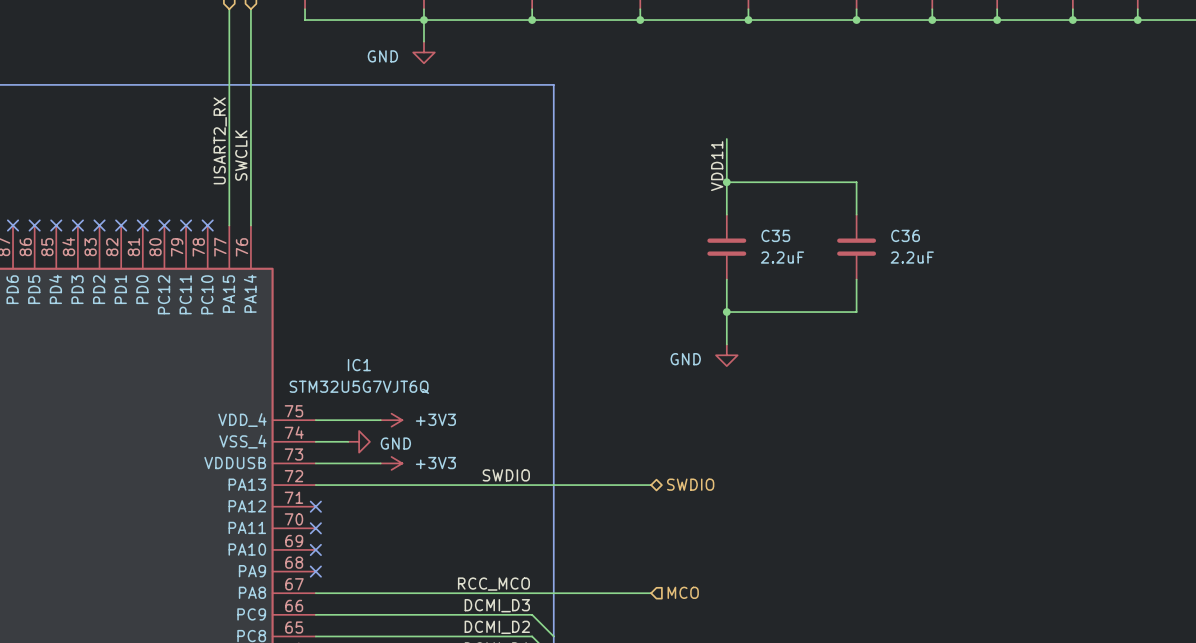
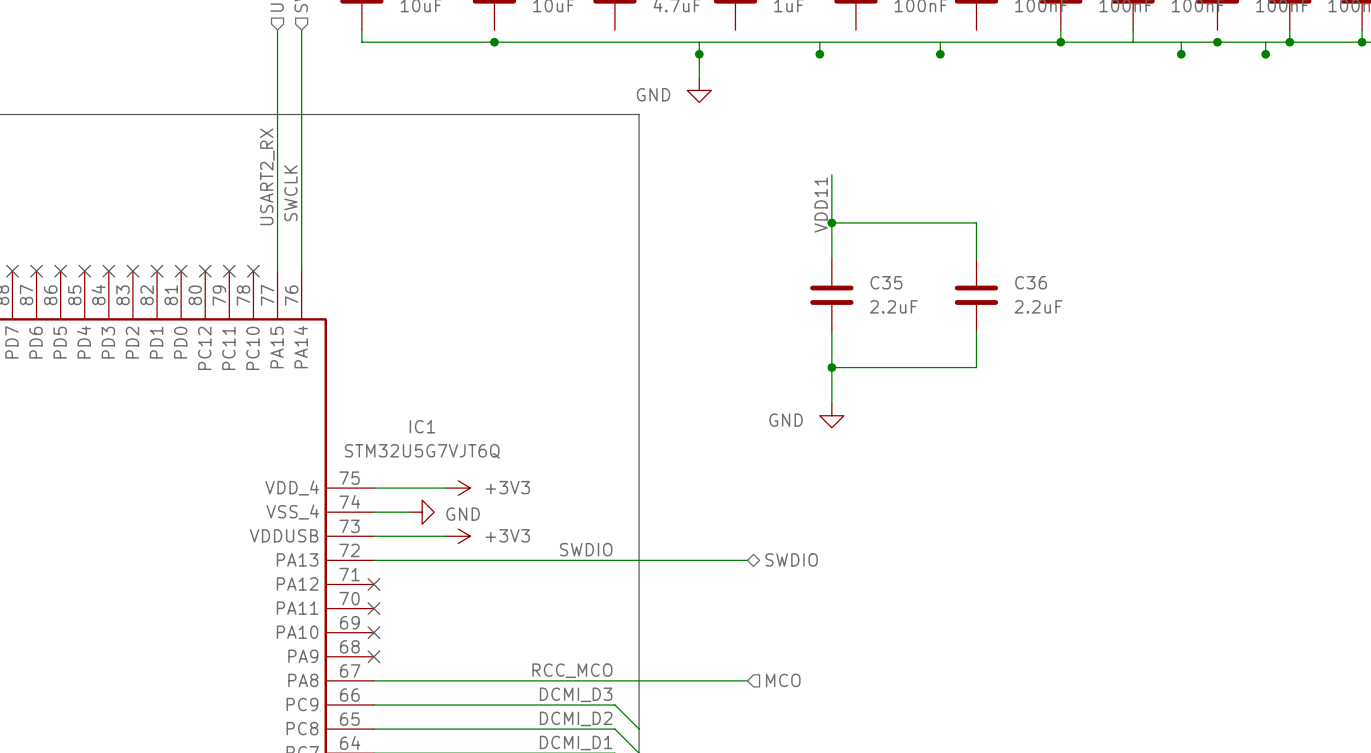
wire: (423, 9) (423, 41) -> (699, 42) (699, 78)
wire: (532, 9) (532, 20) -> (819, 42) (819, 54)
wire: (640, 9) (640, 20) -> (940, 42) (940, 54)
wire: (748, 9) (748, 20) -> none
wire: (856, 9) (856, 20) -> (1181, 42) (1181, 54)
wire: (1072, 9) (1072, 20) -> (1265, 42) (1265, 54)
junction: (532, 20) -> none
junction position: (640, 20) -> (699, 54)
junction position: (748, 20) -> (819, 54)
junction position: (856, 20) -> (940, 54)
junction position: (997, 20) -> (1181, 54)
junction: none -> (1265, 54)
power symbol position: GND (423, 52) -> GND (699, 90)

